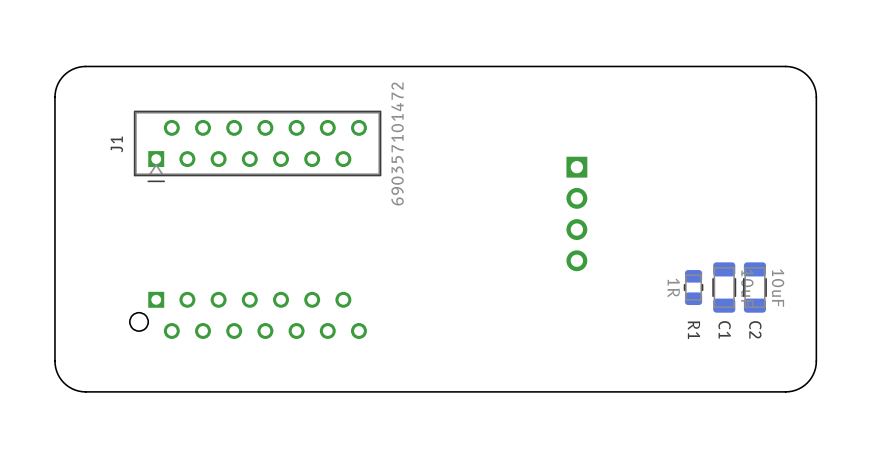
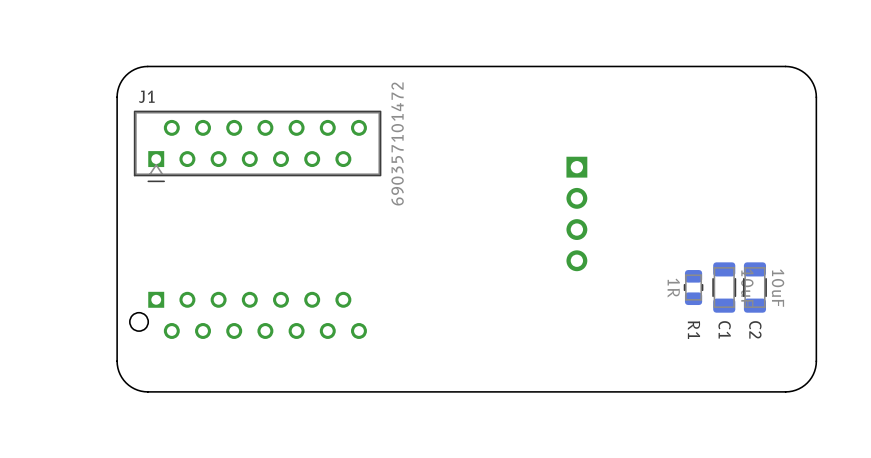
board edge: (147, 66) (75, 68) (61, 78) (56, 87) (54, 97) (54, 361) (56, 371) (63, 382) (78, 391) (147, 391) -> (147, 66) (134, 69) (126, 75) (118, 87) (117, 97) (117, 364) (120, 374) (126, 382) (134, 388) (147, 391)
J1 name rotation: 0° (116, 144) -> 90° clockwise (146, 96)
J1 name position: J1 (116, 144) -> J1 (146, 96)

